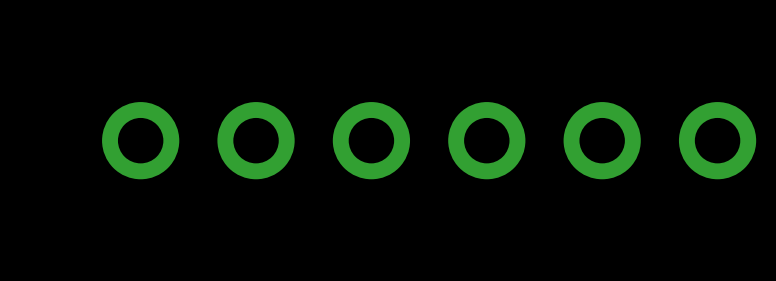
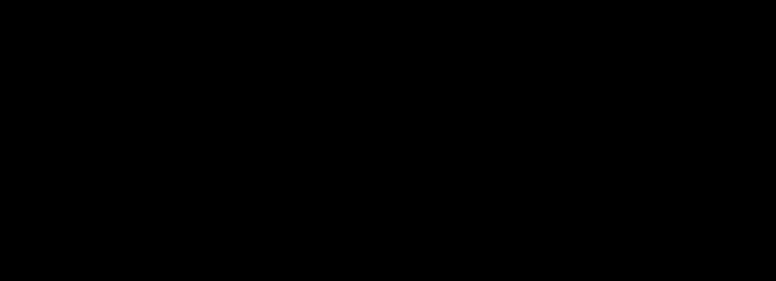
part: (429, 140) -> none

